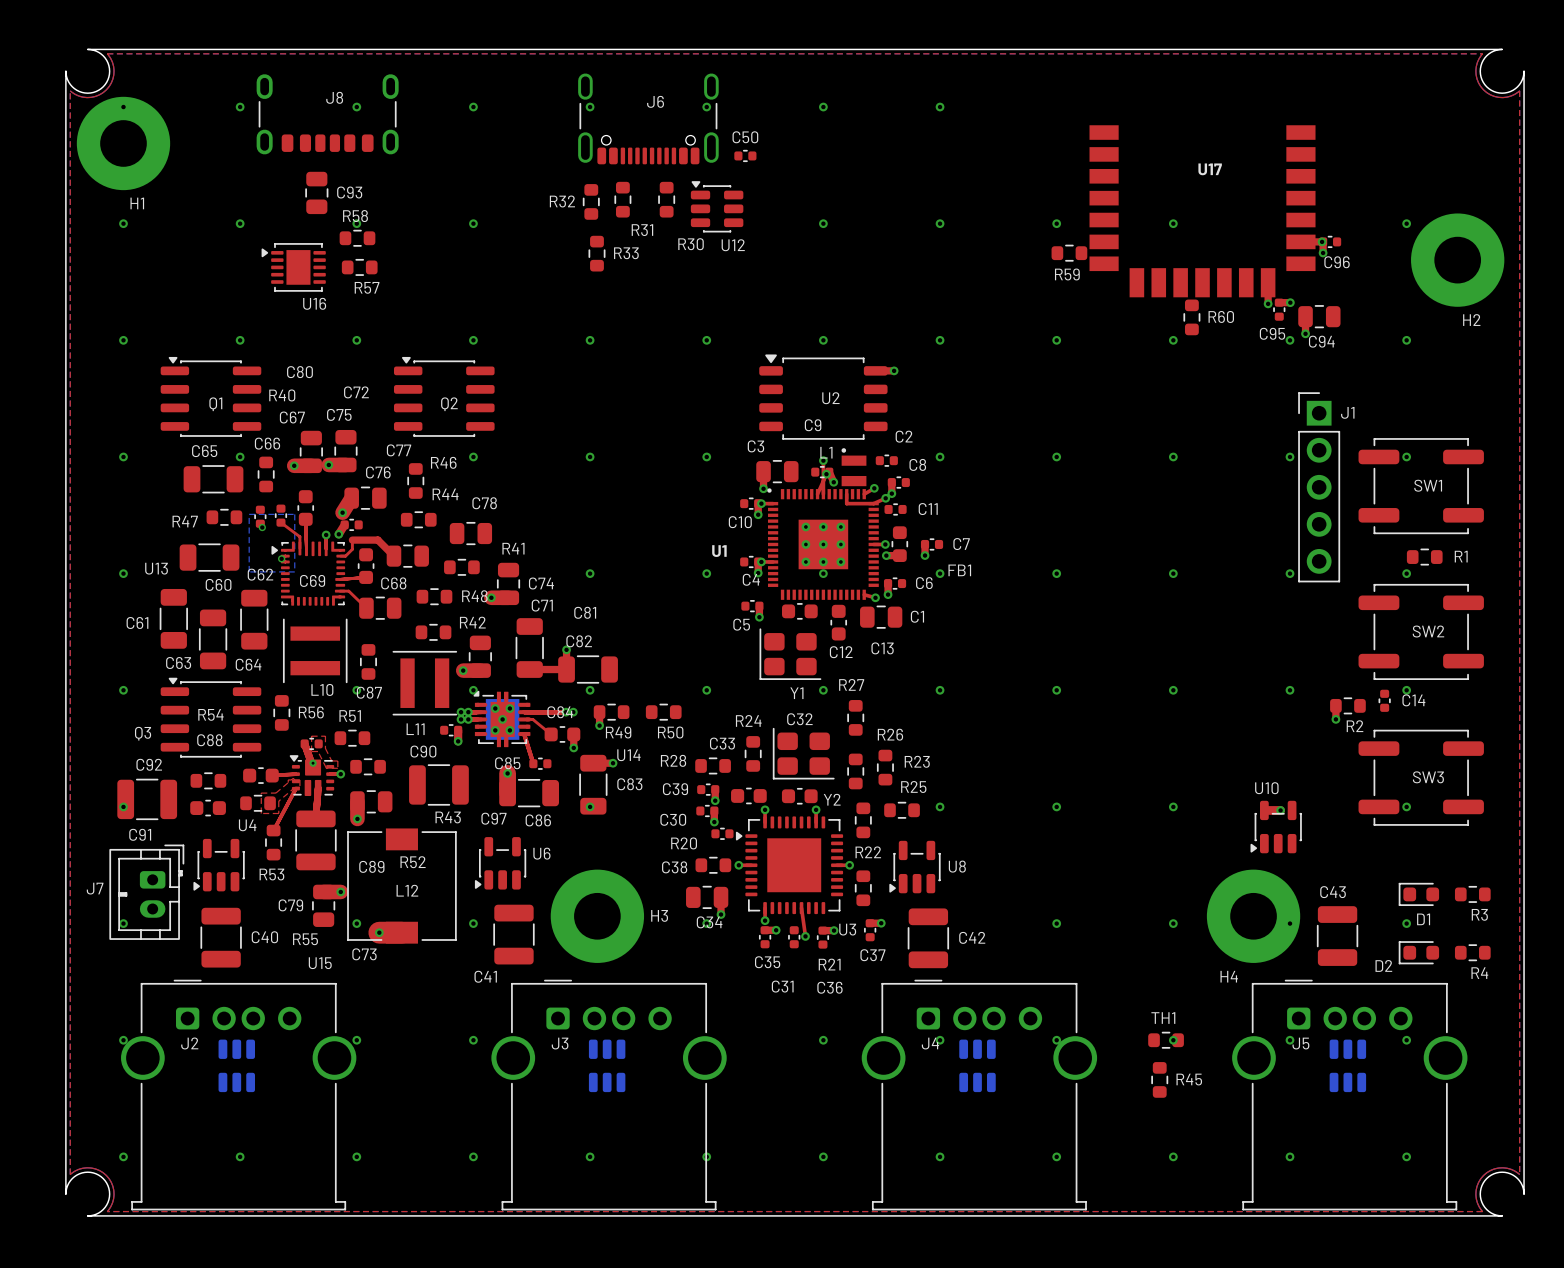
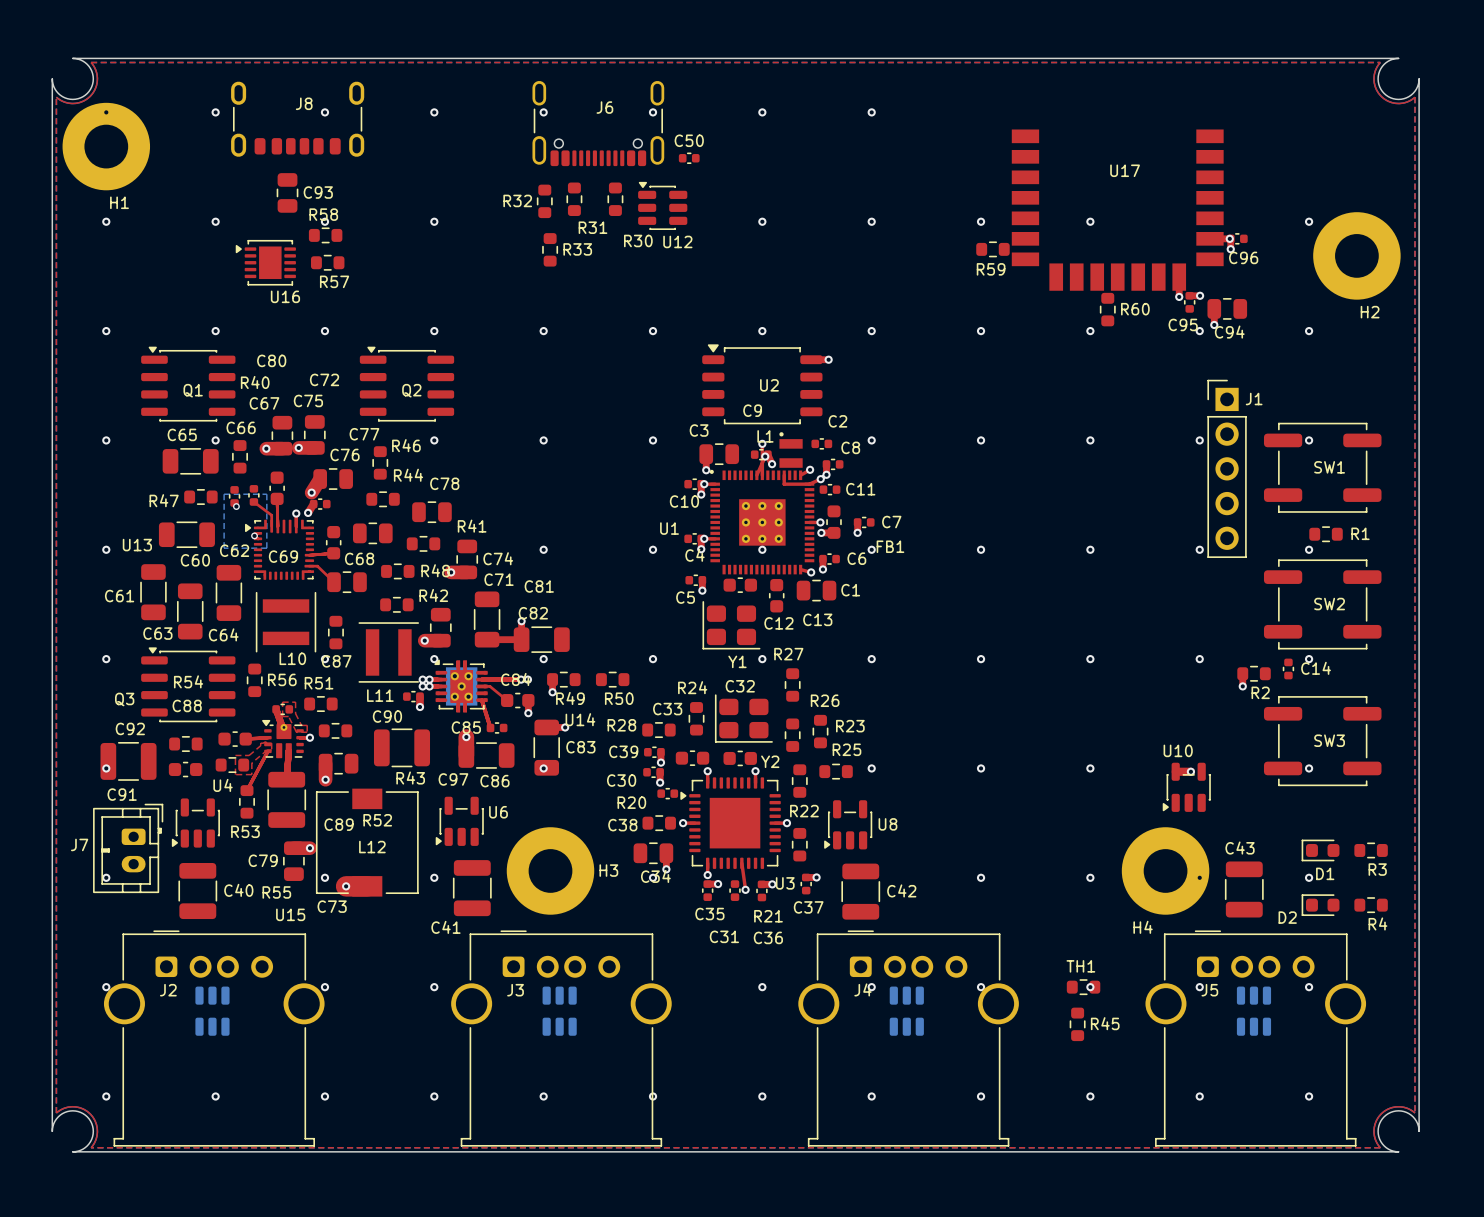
top track: (340, 556) (345, 556) (352, 549) (352, 540) (377, 540) (393, 556) -> none

